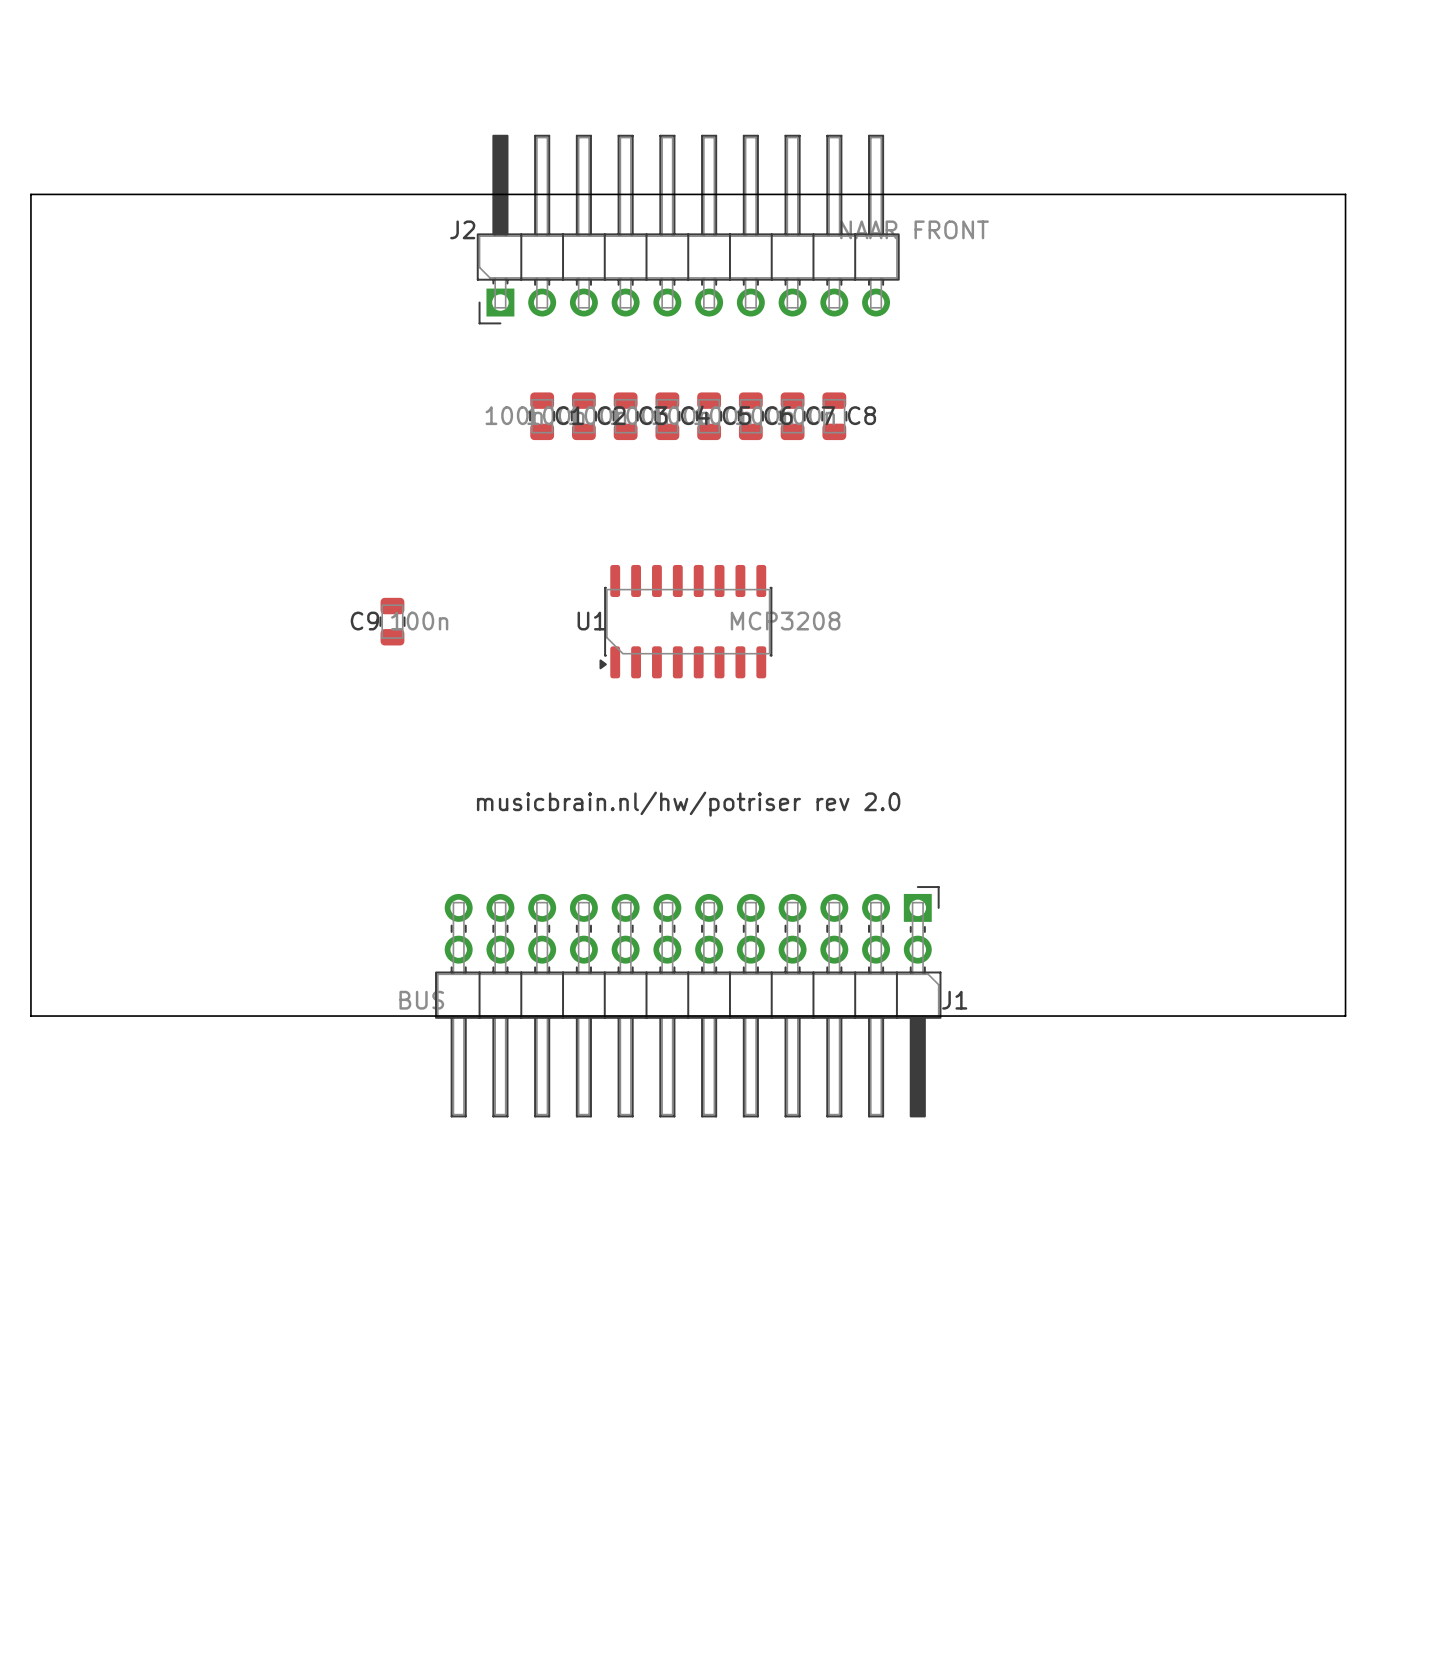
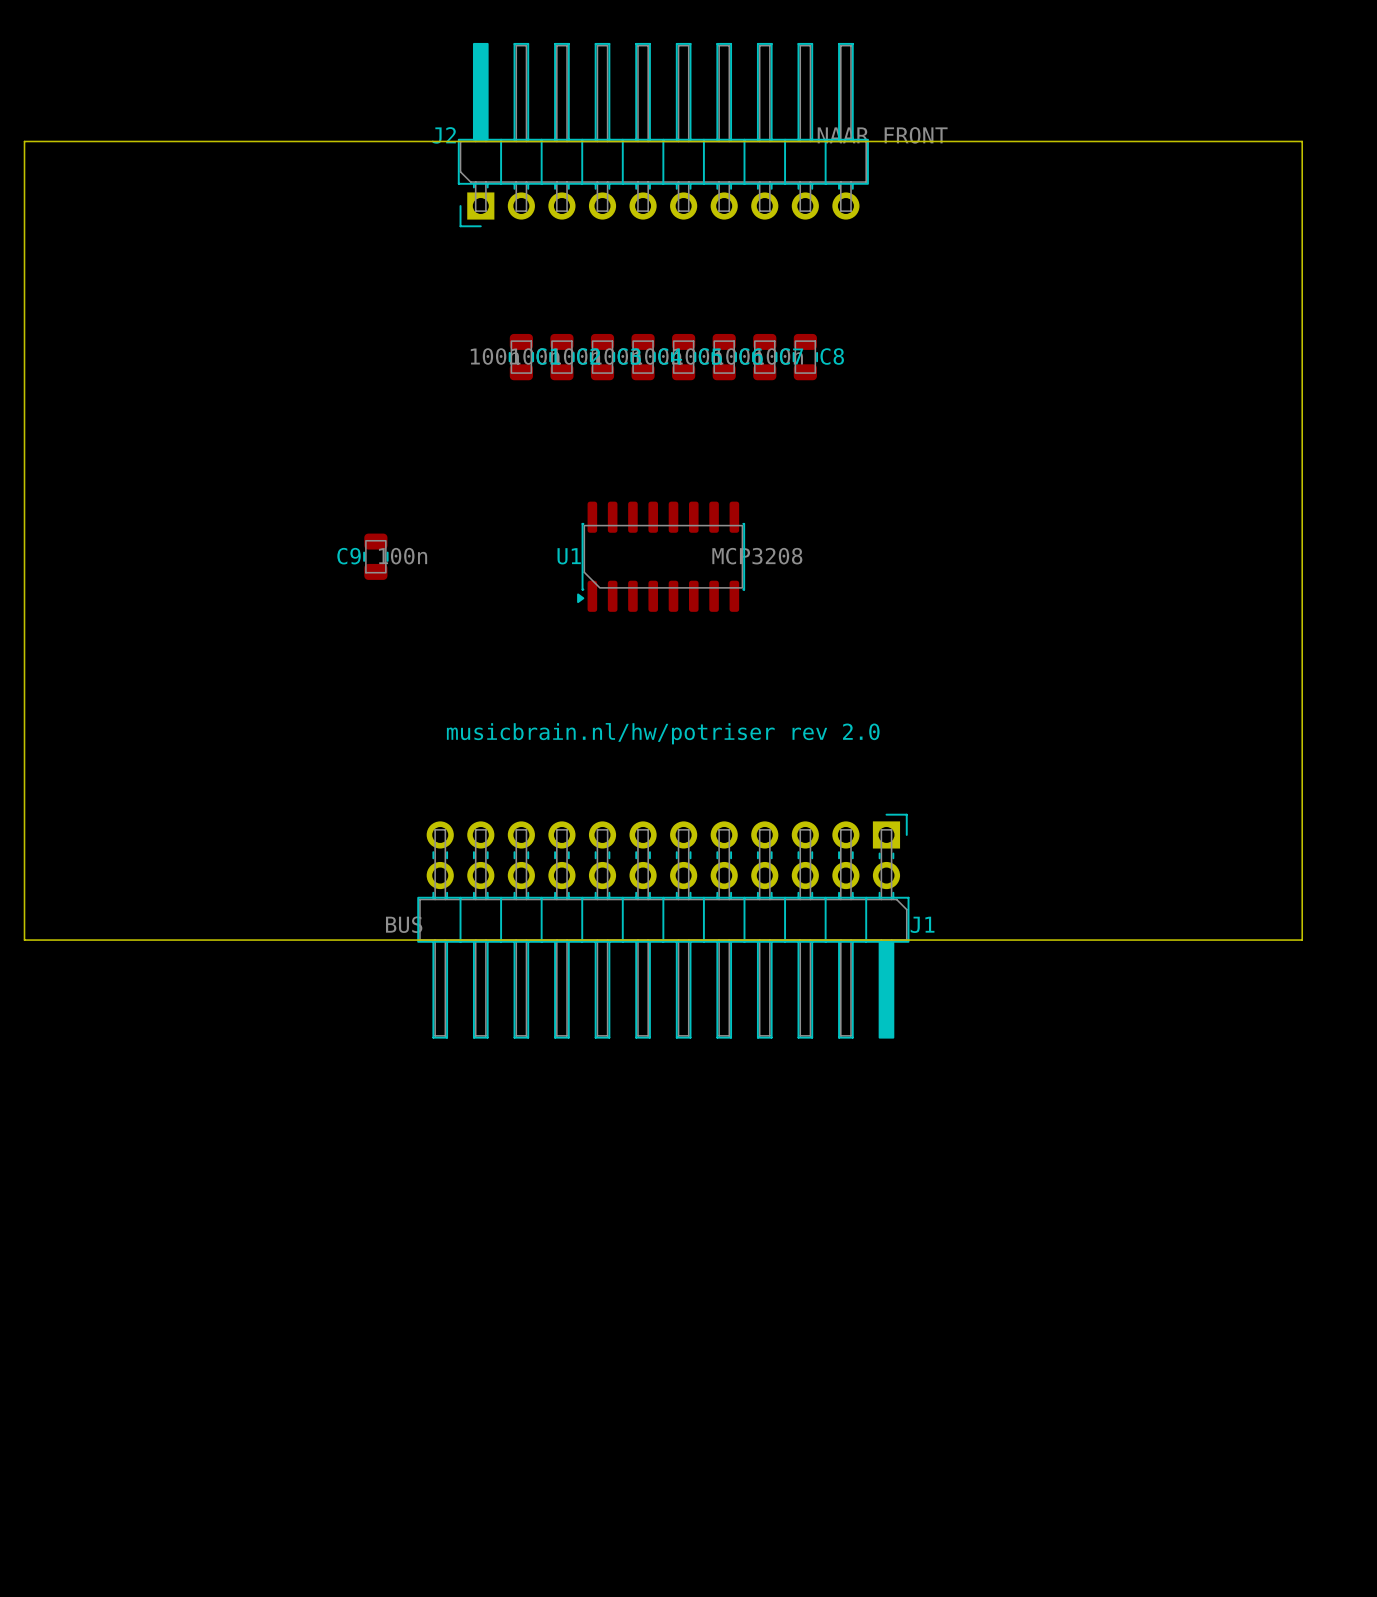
J2 position: (688, 229) -> (663, 135)

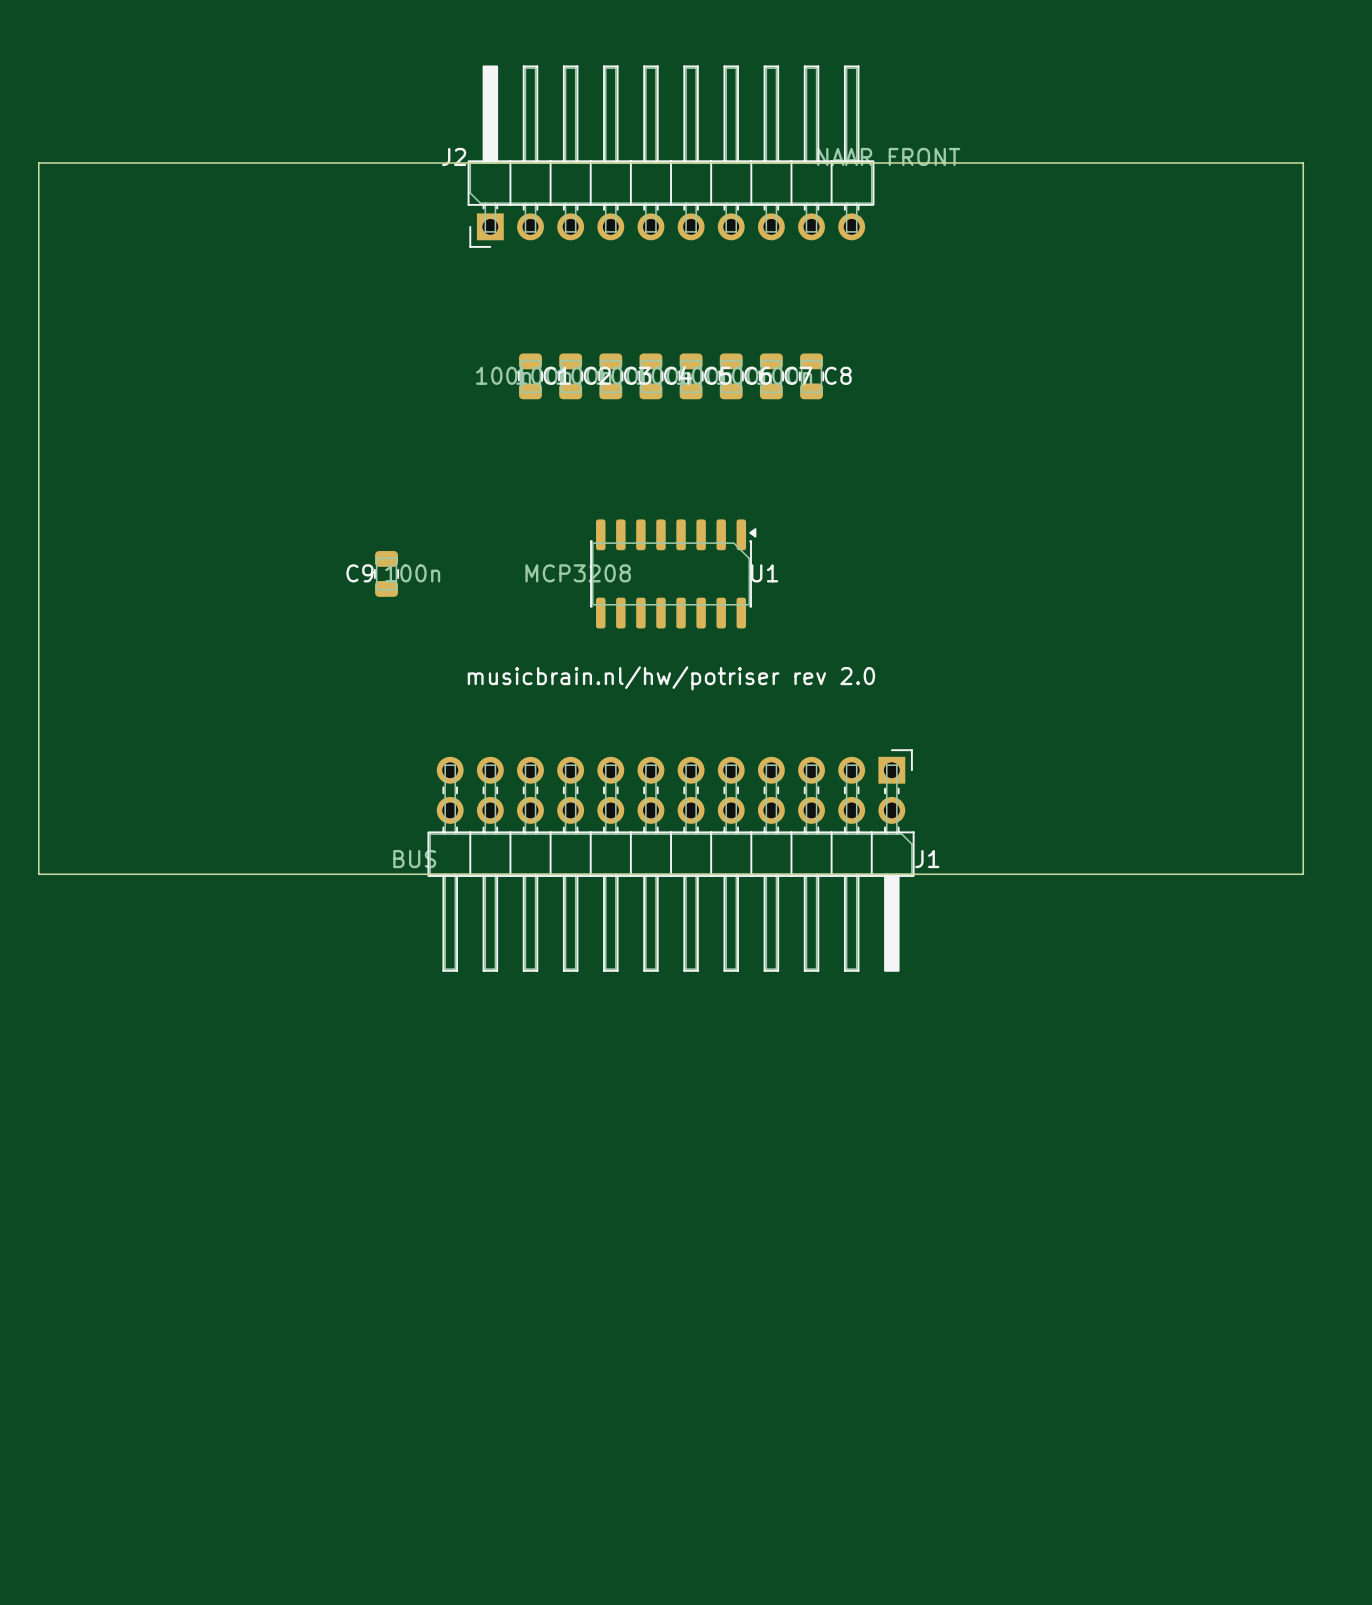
U1 rotation: 0° (661, 556) -> 180° (673, 573)
text position: musicbrain.nl/hw/potriser rev 2.0 (663, 733) -> musicbrain.nl/hw/potriser rev 2.0 (671, 678)
board edge: (24, 860) (24, 940) (1302, 940) (1302, 860) -> (38, 874) (1303, 874)
J1 position: (663, 926) -> (671, 860)

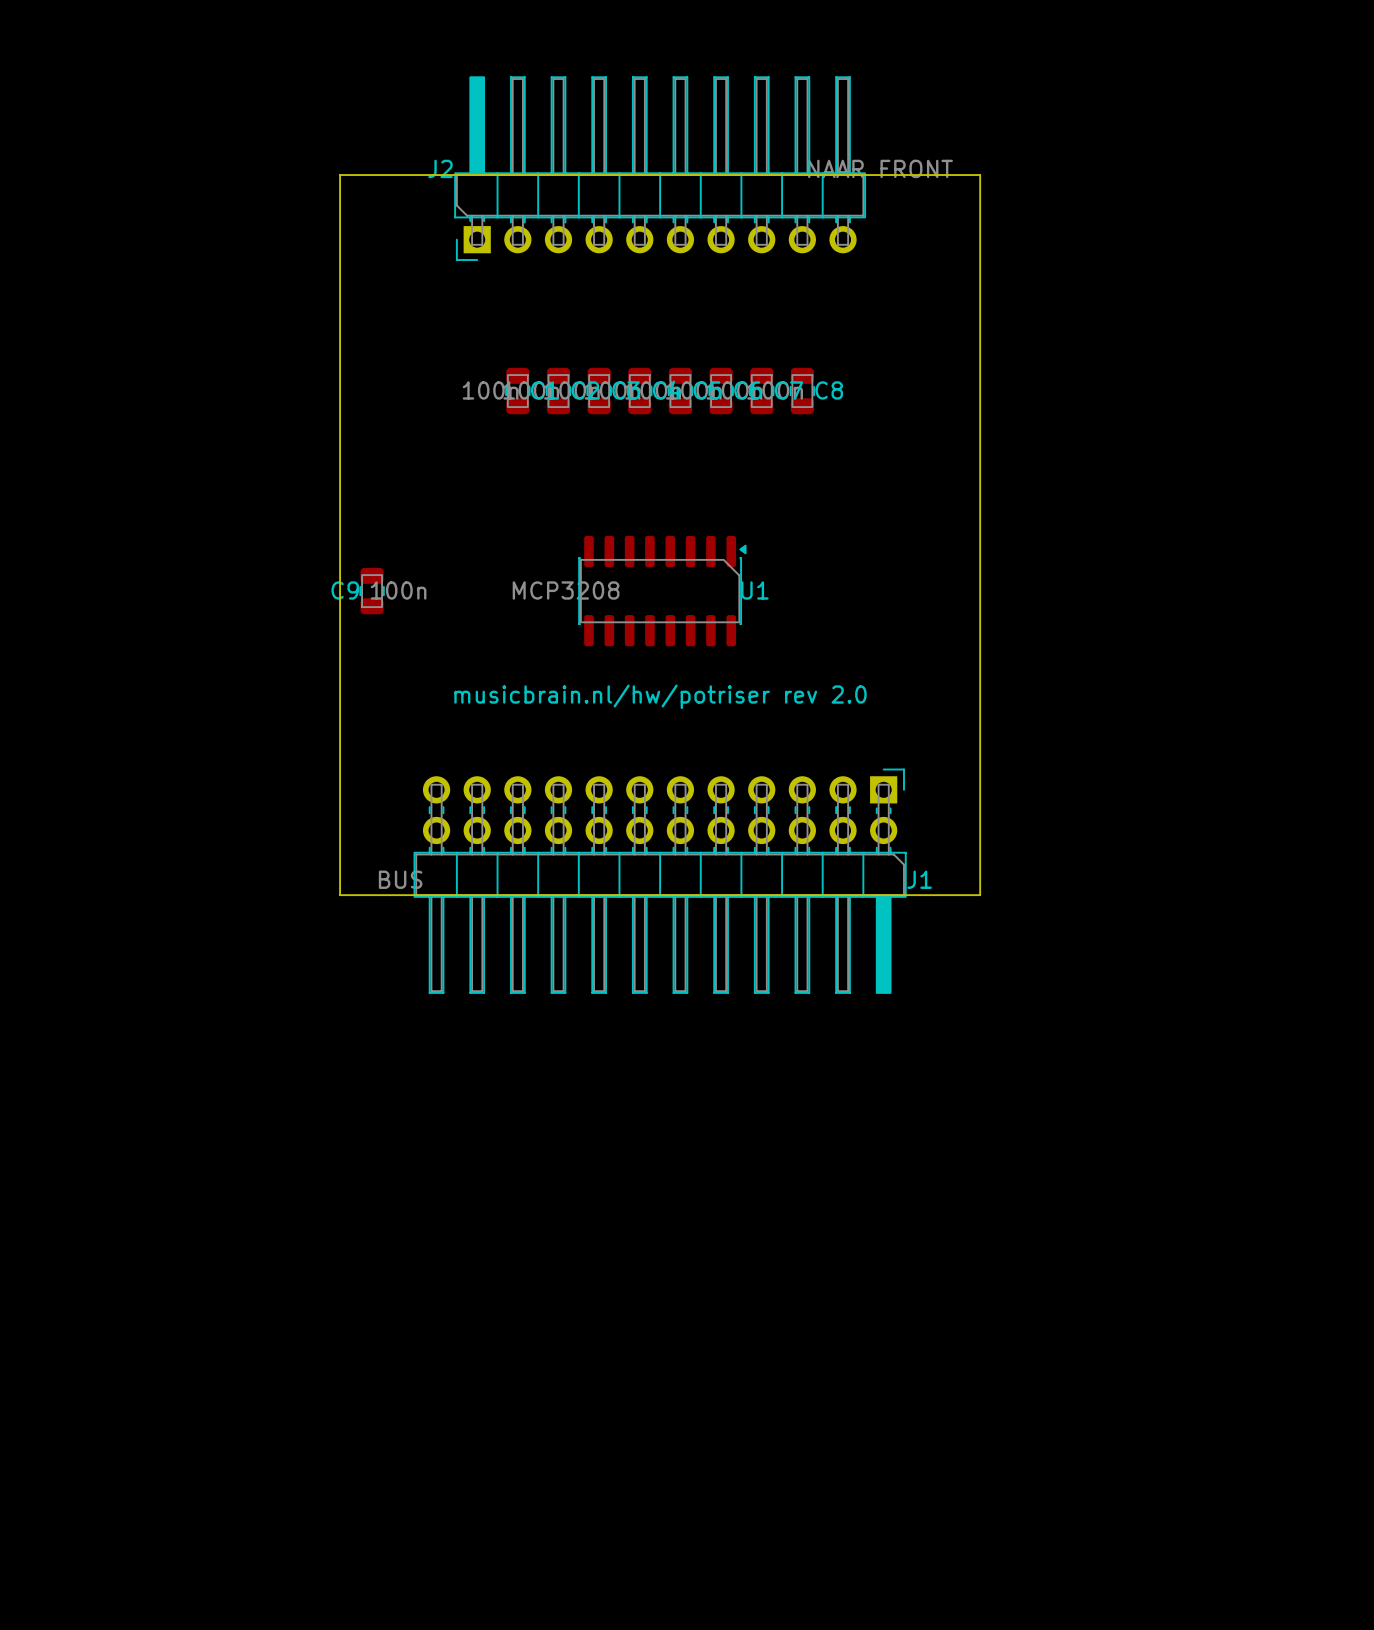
board edge: (354, 162) (38, 162) (38, 874) (354, 874) -> (340, 175) (340, 895)
board edge: (987, 162) (1303, 162) (1303, 874) (987, 874) -> (980, 175) (980, 895)

